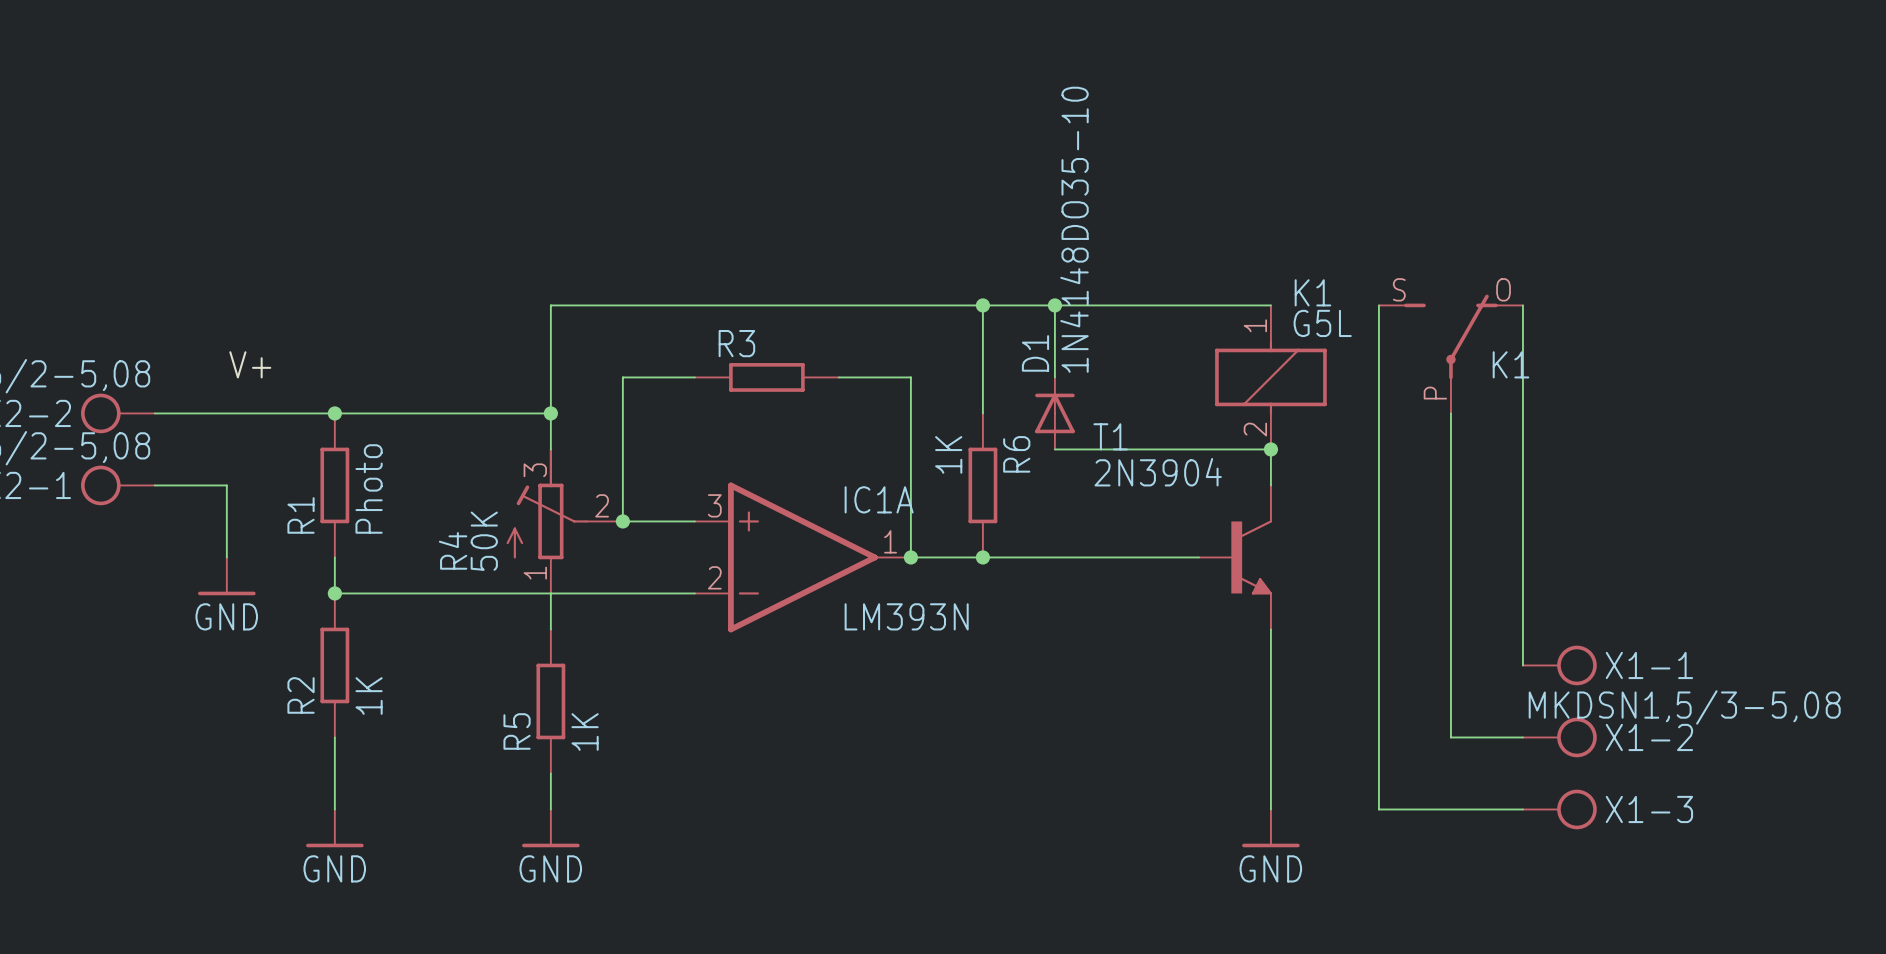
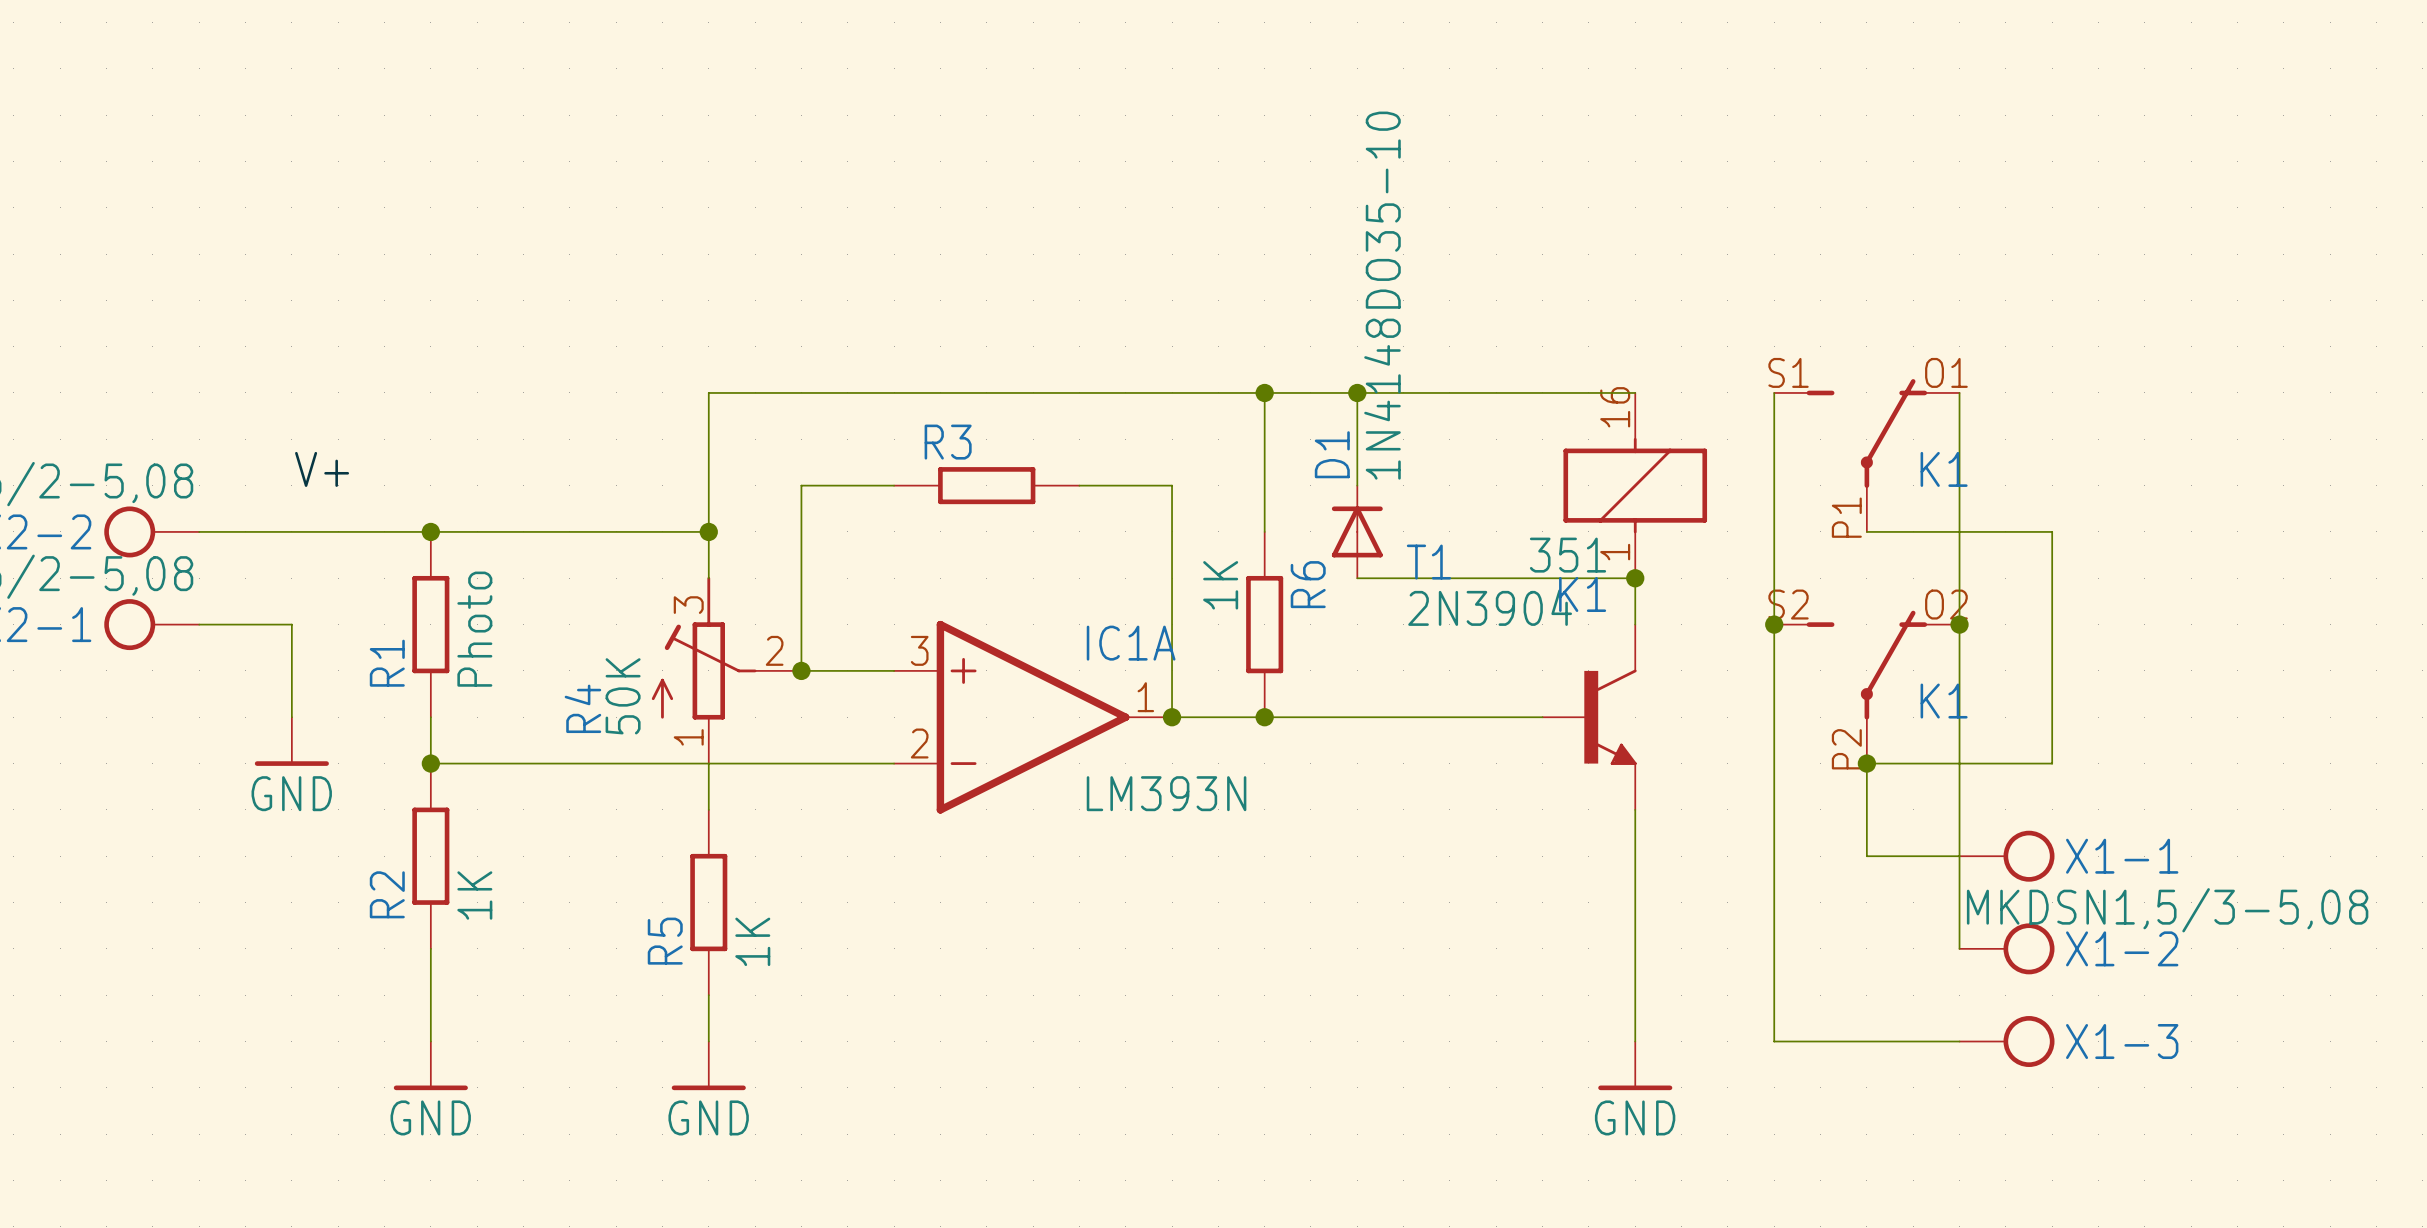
K1 pin number: S (1399, 289) -> S1 (1788, 372)
K1 pin number: O (1503, 289) -> O1 (1946, 372)
K1 name position: K1 (1312, 292) -> K1 (1582, 594)
K1 value: G5L (1322, 323) -> 351 (1568, 555)
K1 pin number: 1 (1255, 325) -> 16 (1615, 407)
K1 pin number: P (1435, 393) -> P1 (1846, 517)
wire: (1450, 413) (1450, 593) -> (1866, 531) (2052, 531) (2052, 763) (1866, 763)
K1 pin number: 2 (1255, 429) -> 1 (1615, 552)
junction: none -> (1774, 624)
junction: none -> (1959, 624)
K1: none -> (1866, 687)
junction: none -> (1866, 763)
wire: (1450, 665) (1450, 737) (1522, 737) -> (1866, 856) (1959, 856) (1959, 948)

